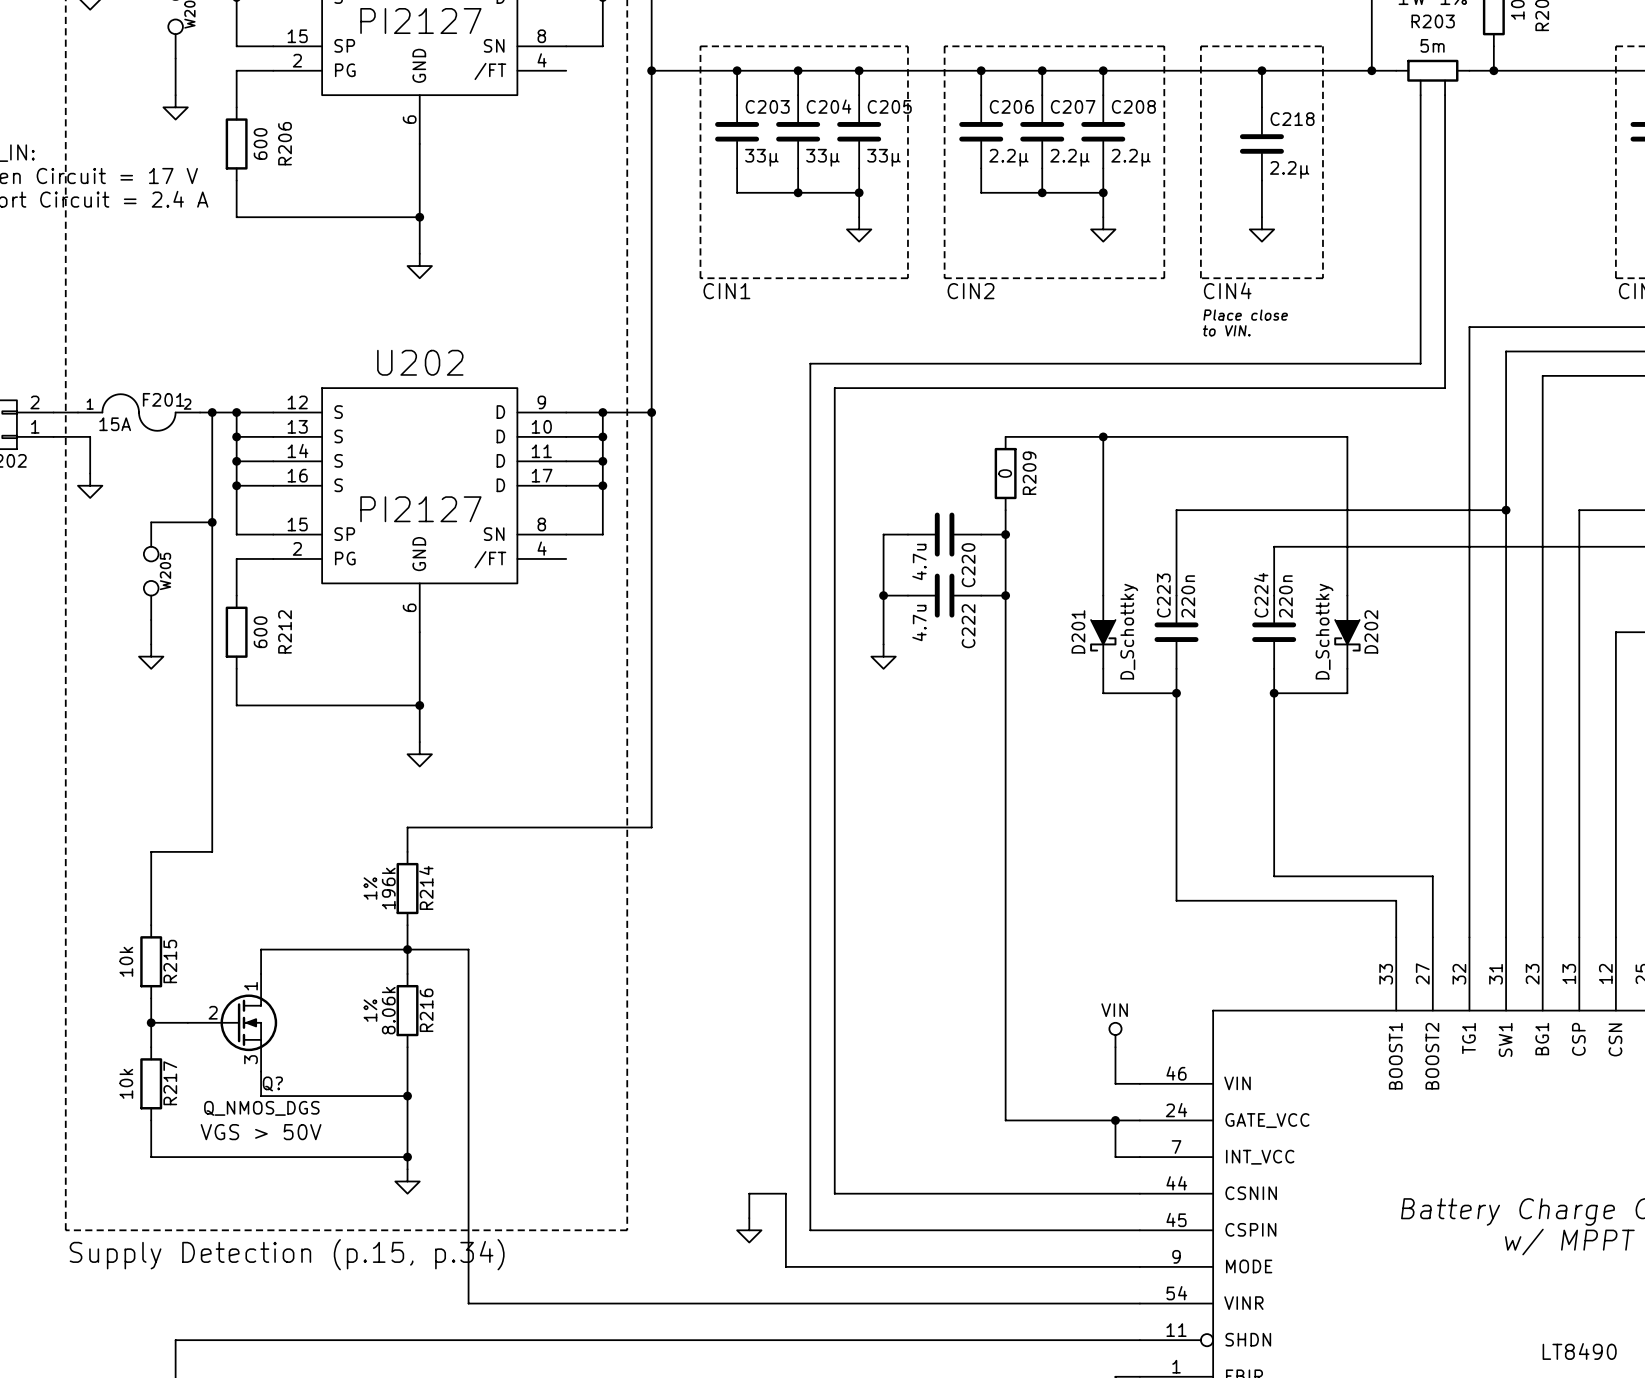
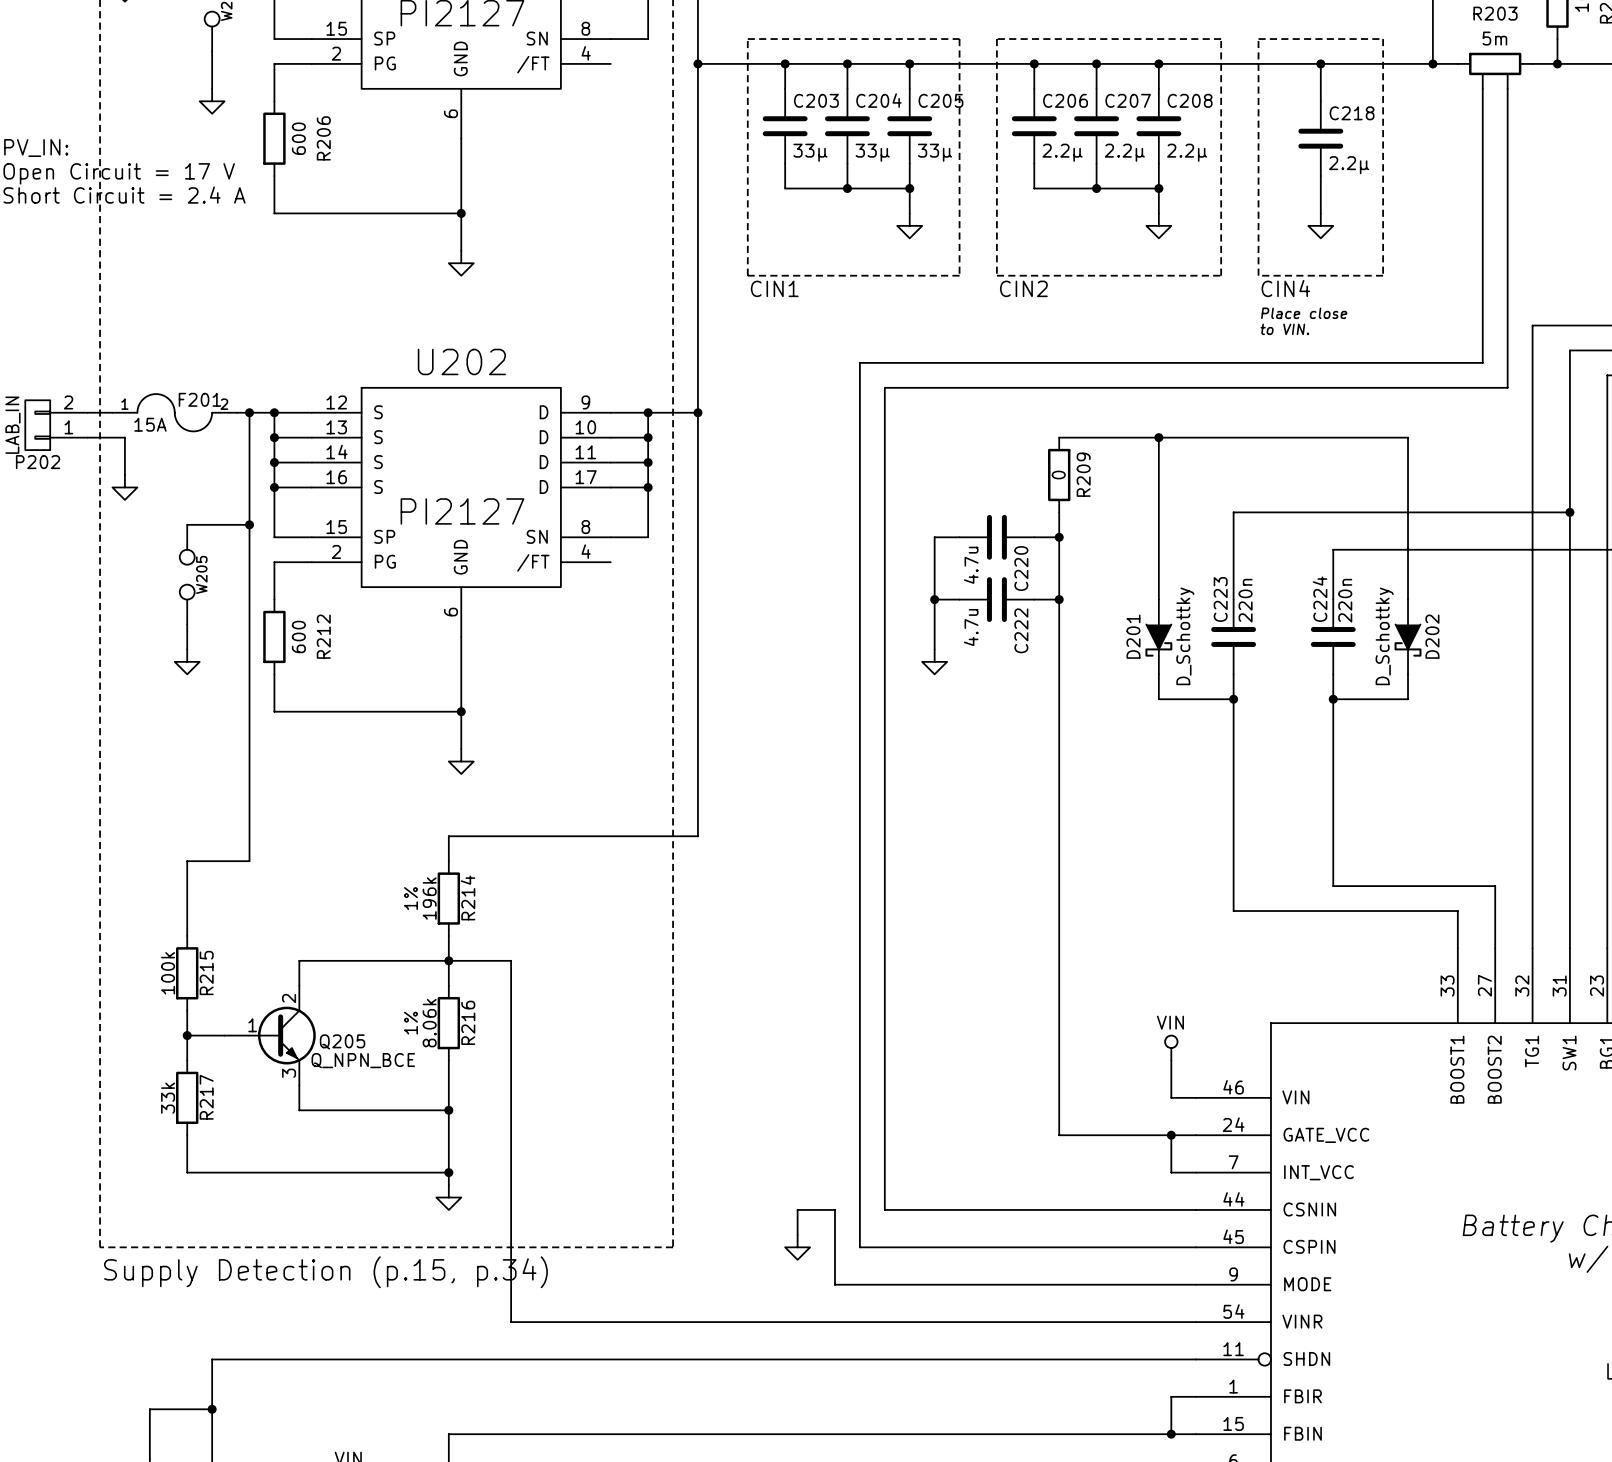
R215 value: 10k (126, 961) -> 100k (168, 973)
Q?: Q_NMOS_DGS (232, 1022) -> none
Q205: none -> Q_NPN_BCE (270, 1035)
R217 value: 10k (126, 1083) -> 33k (168, 1098)

